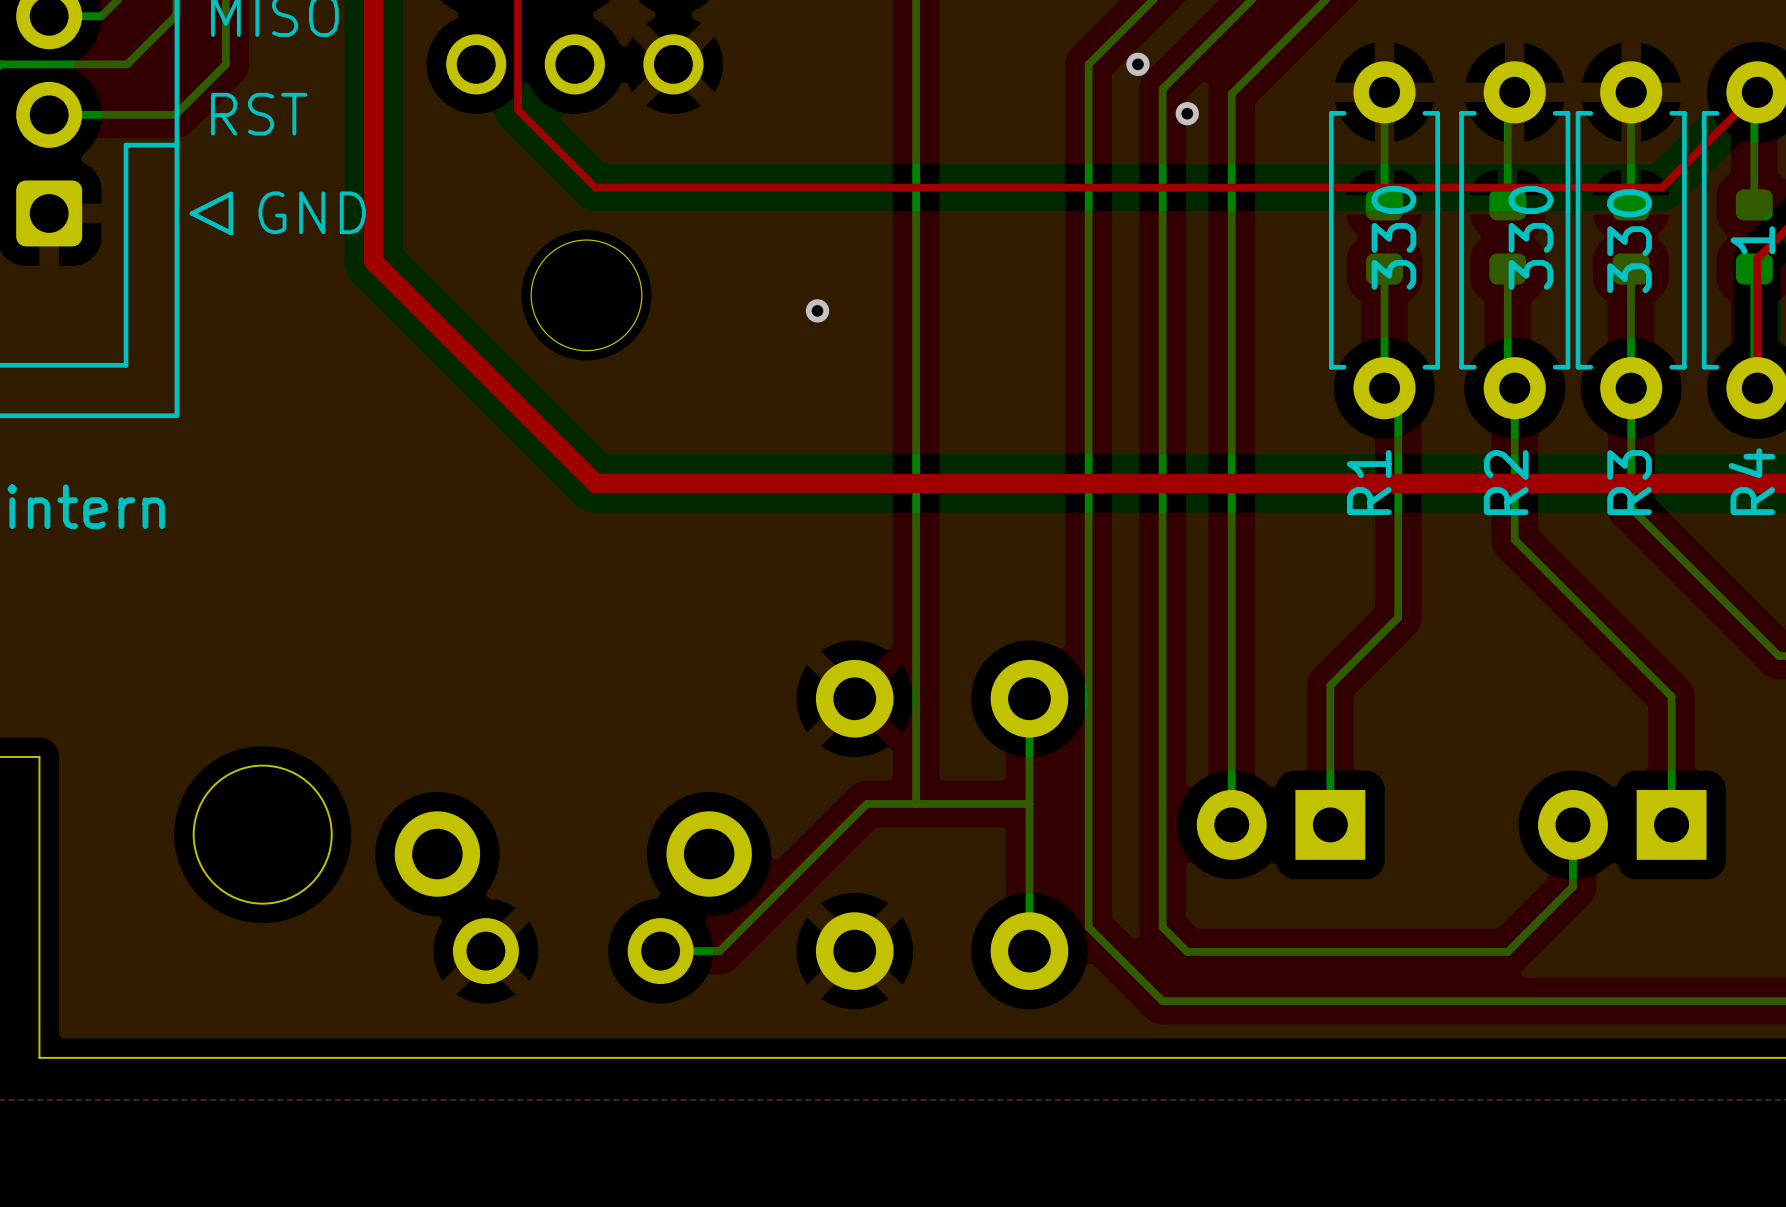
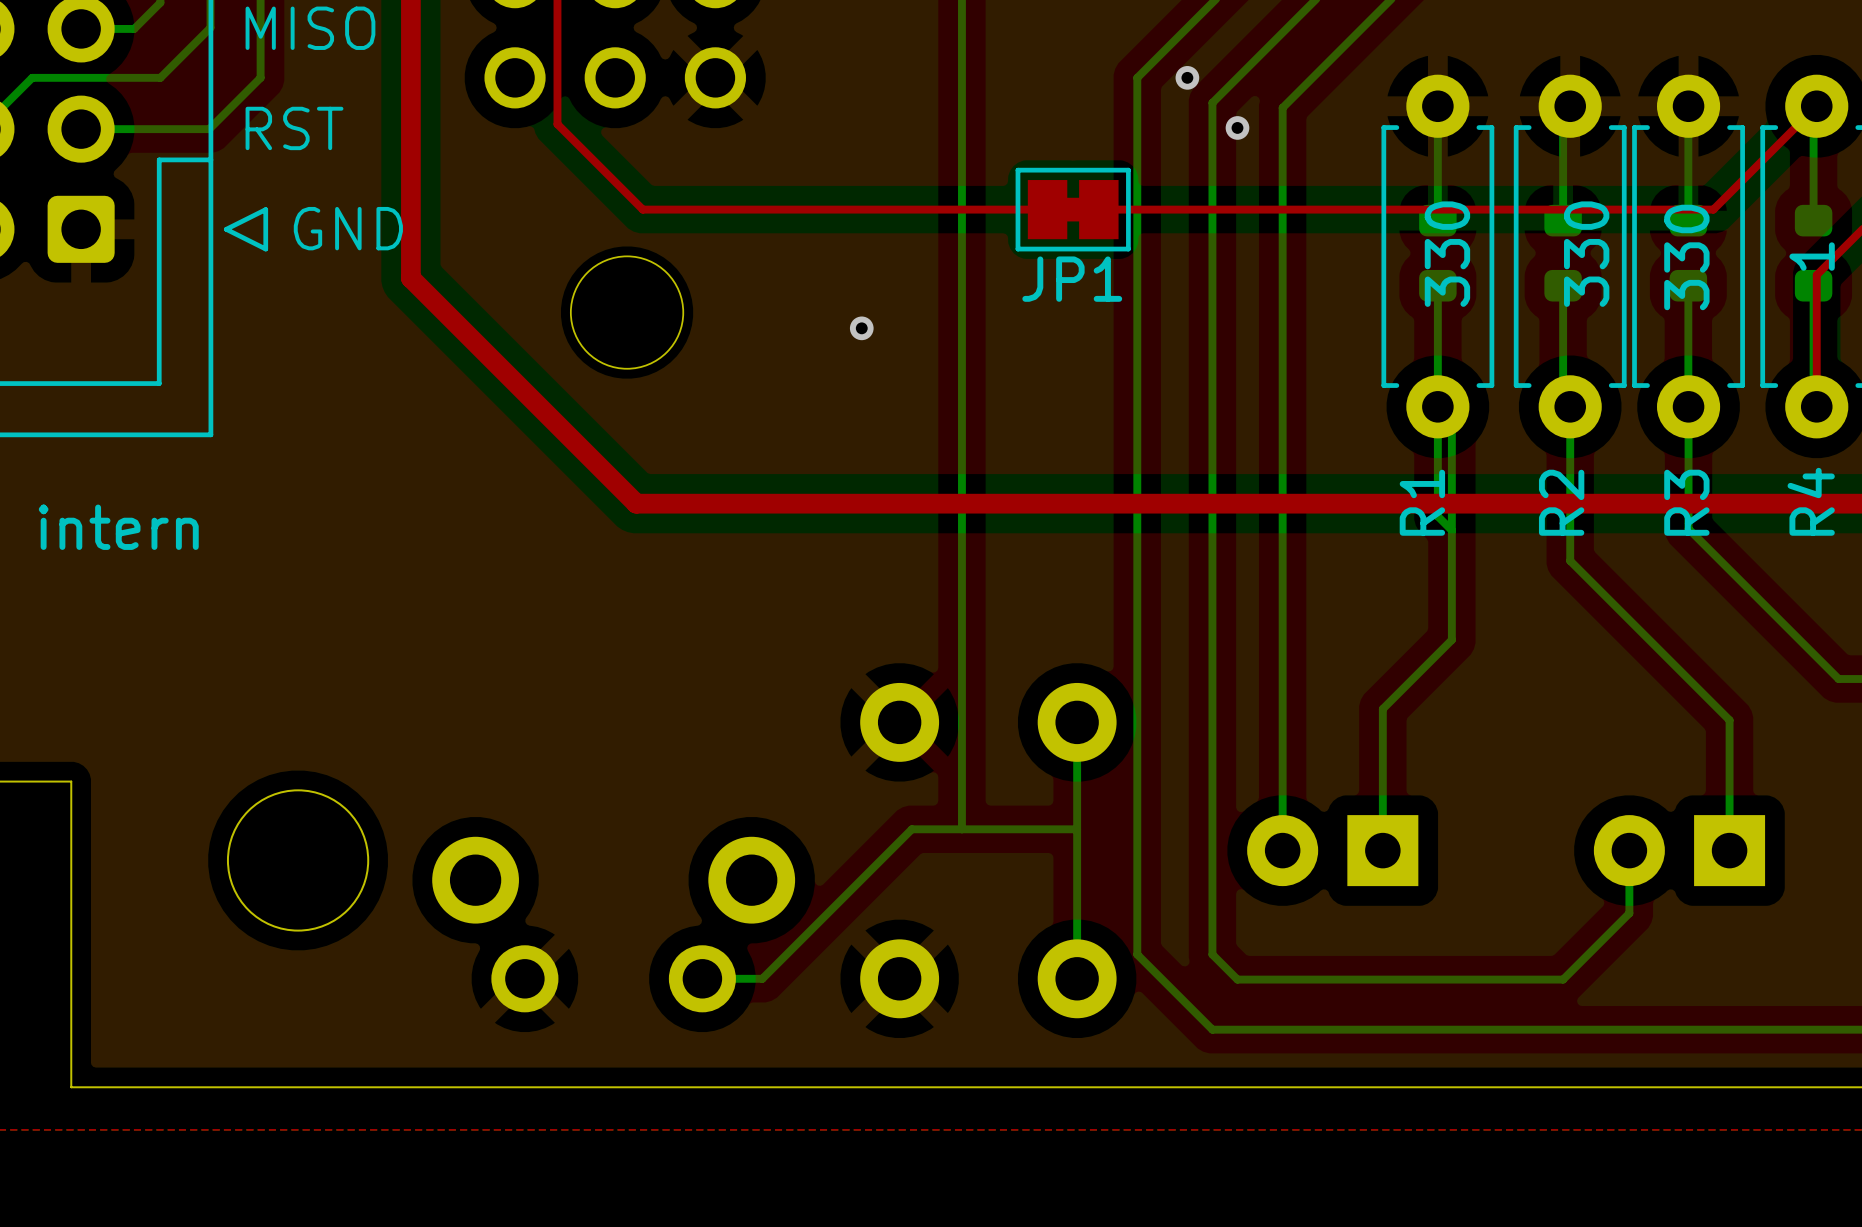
top track: (595, 187) (1662, 187) -> (1098, 209) (1713, 209) (1719, 203)
top track: none -> (636, 203) (642, 209) (1047, 209)
JP1: none -> (1073, 209)
bottom track: none -> (1437, 406) (1437, 516) (1451, 530)

